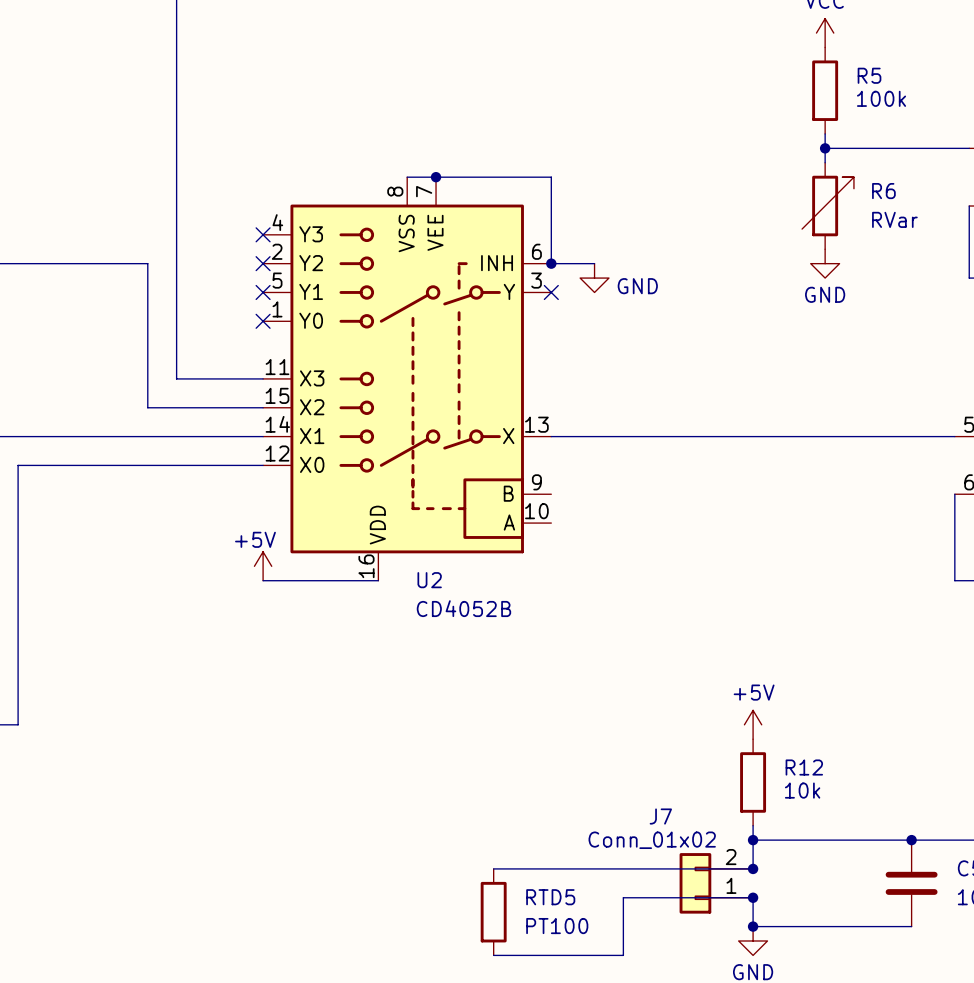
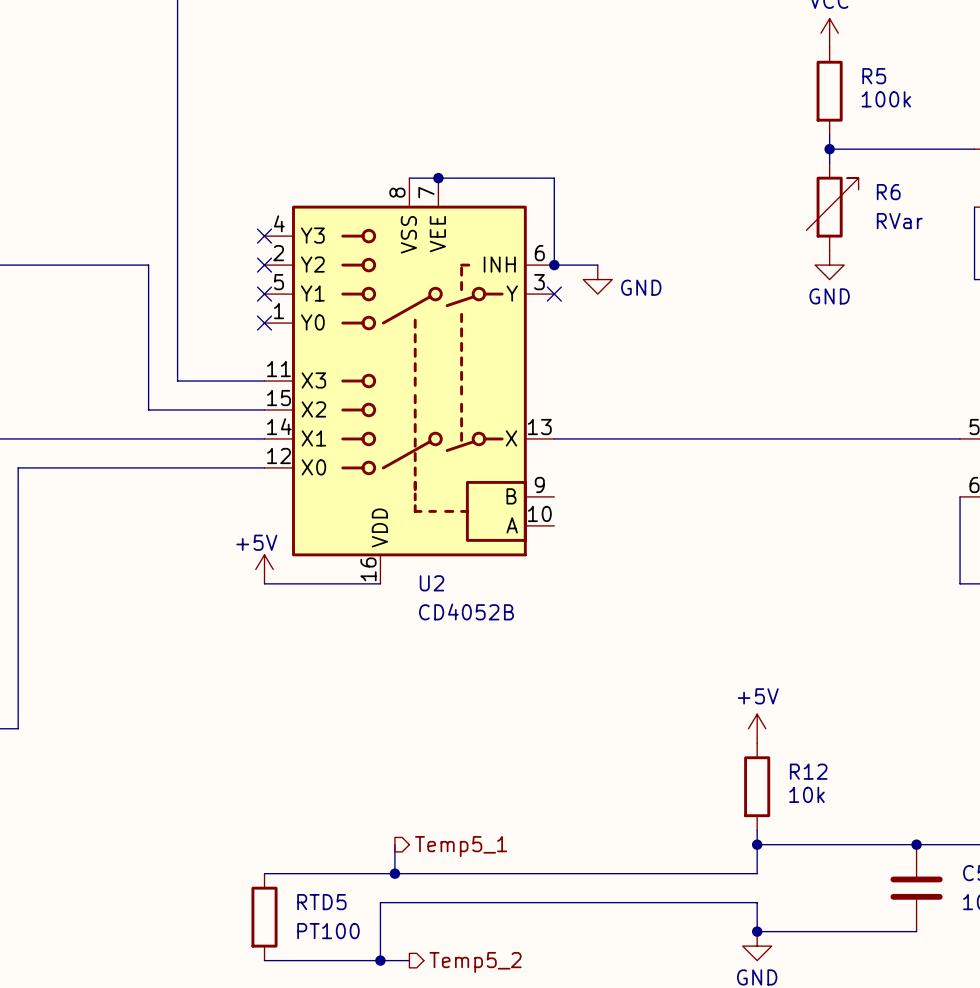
wire: none -> (394, 844) (394, 873)
hierarchical label: none -> Temp5_1 (461, 846)
wire: none -> (264, 873) (496, 873)
junction: none -> (394, 873)
junction: (753, 868) -> none
J7: Conn_01x02 (716, 883) -> none
wire: (623, 897) (623, 955) (493, 955) -> (626, 902) (380, 902) (380, 960)
junction: (753, 897) -> none
RTD5 position: (493, 912) -> (264, 917)
wire: none -> (264, 960) (409, 960)
junction: none -> (380, 960)
hierarchical label: none -> Temp5_2 (475, 962)

